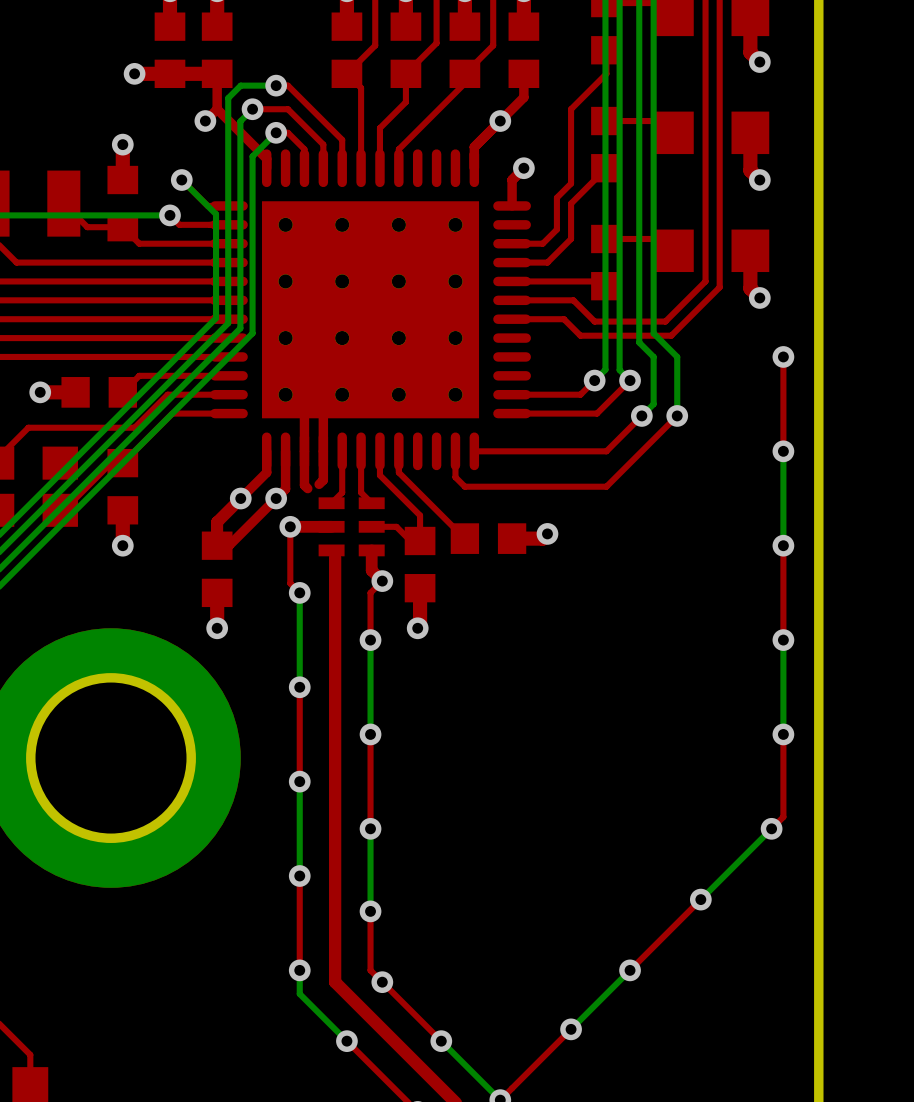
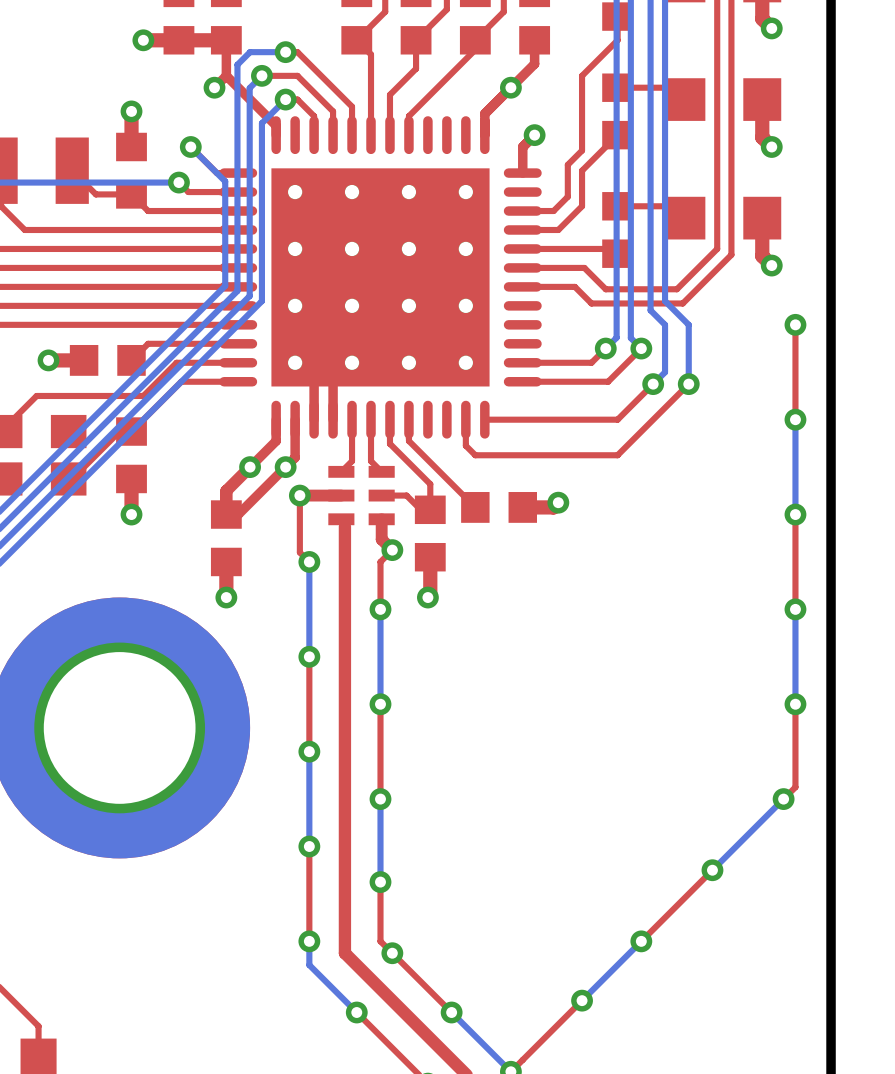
part footprint: [210, 149, 531, 471] -> [219, 116, 542, 439]
top track: (304, 451) (304, 485) (307, 488) -> none
top track: (323, 451) (323, 480) (319, 484) -> none

